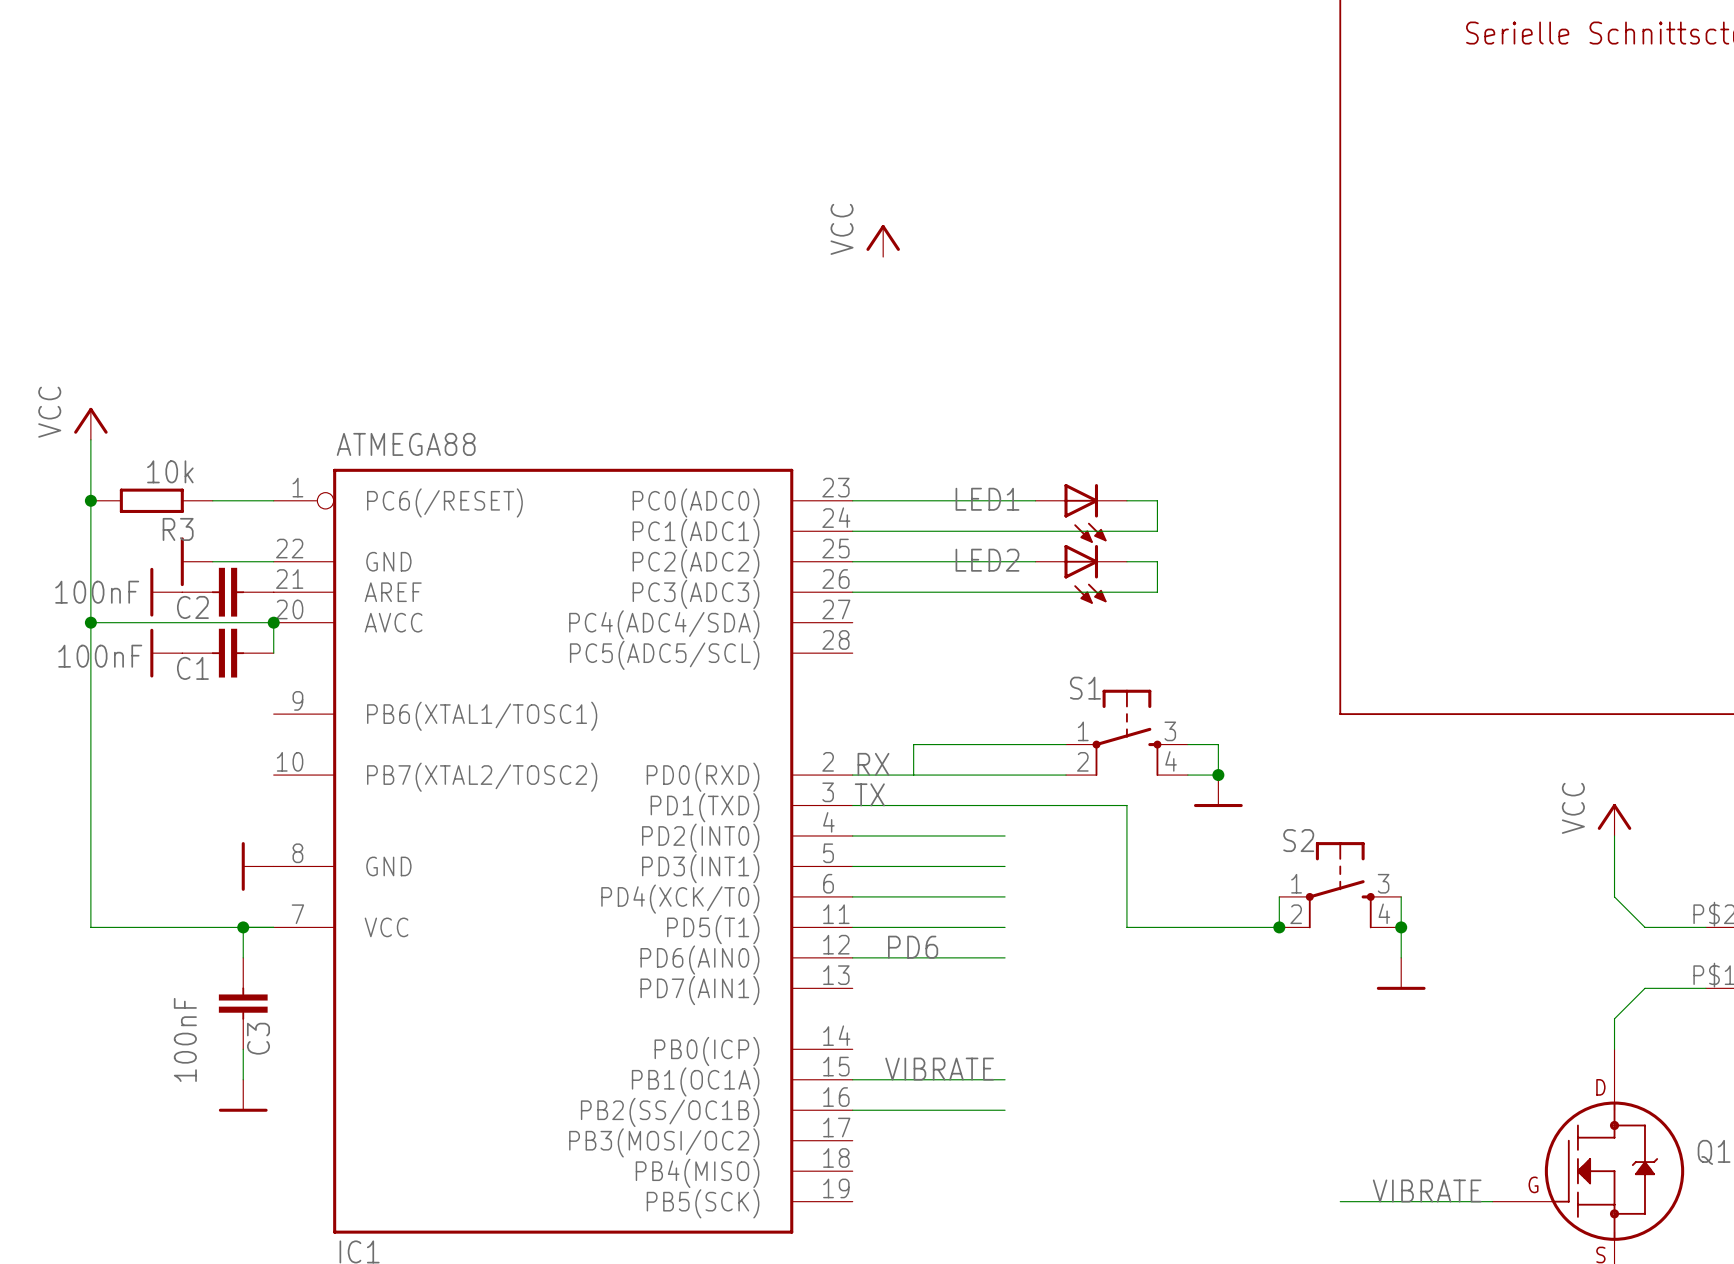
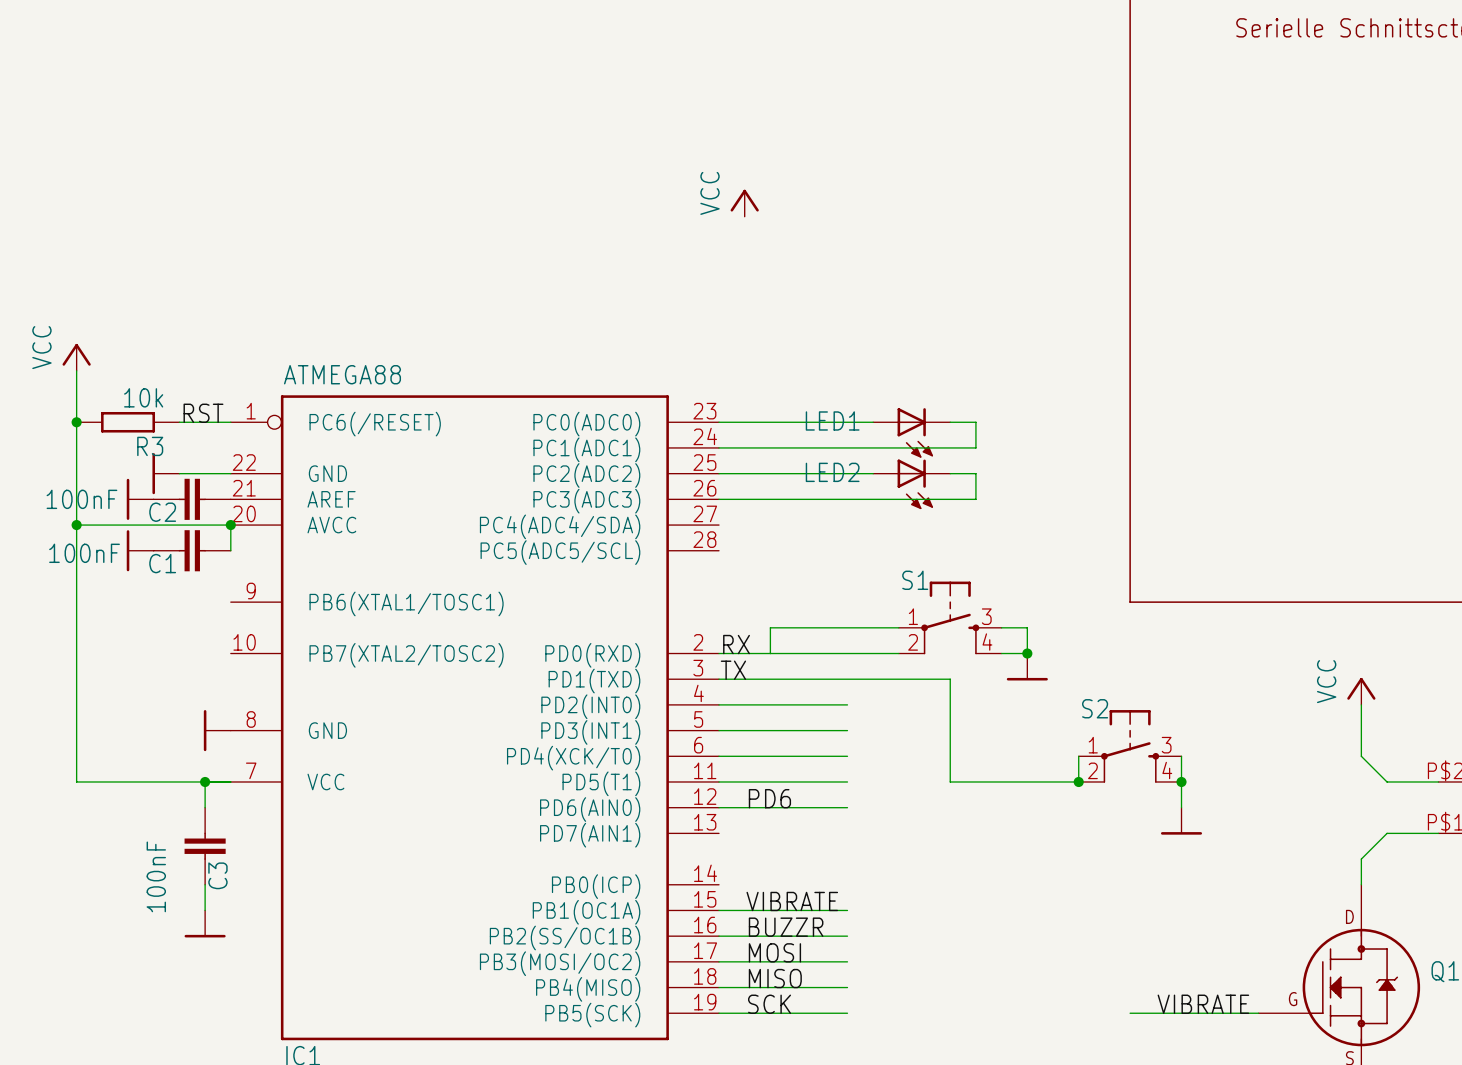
label: none -> RST (203, 413)
label: none -> BUZZR (786, 927)
label: none -> MOSI (774, 952)
wire: none -> (719, 961) (847, 961)
label: none -> MISO (775, 978)
wire: none -> (719, 987) (847, 987)
label: none -> SCK (769, 1004)
wire: none -> (719, 1013) (847, 1013)

